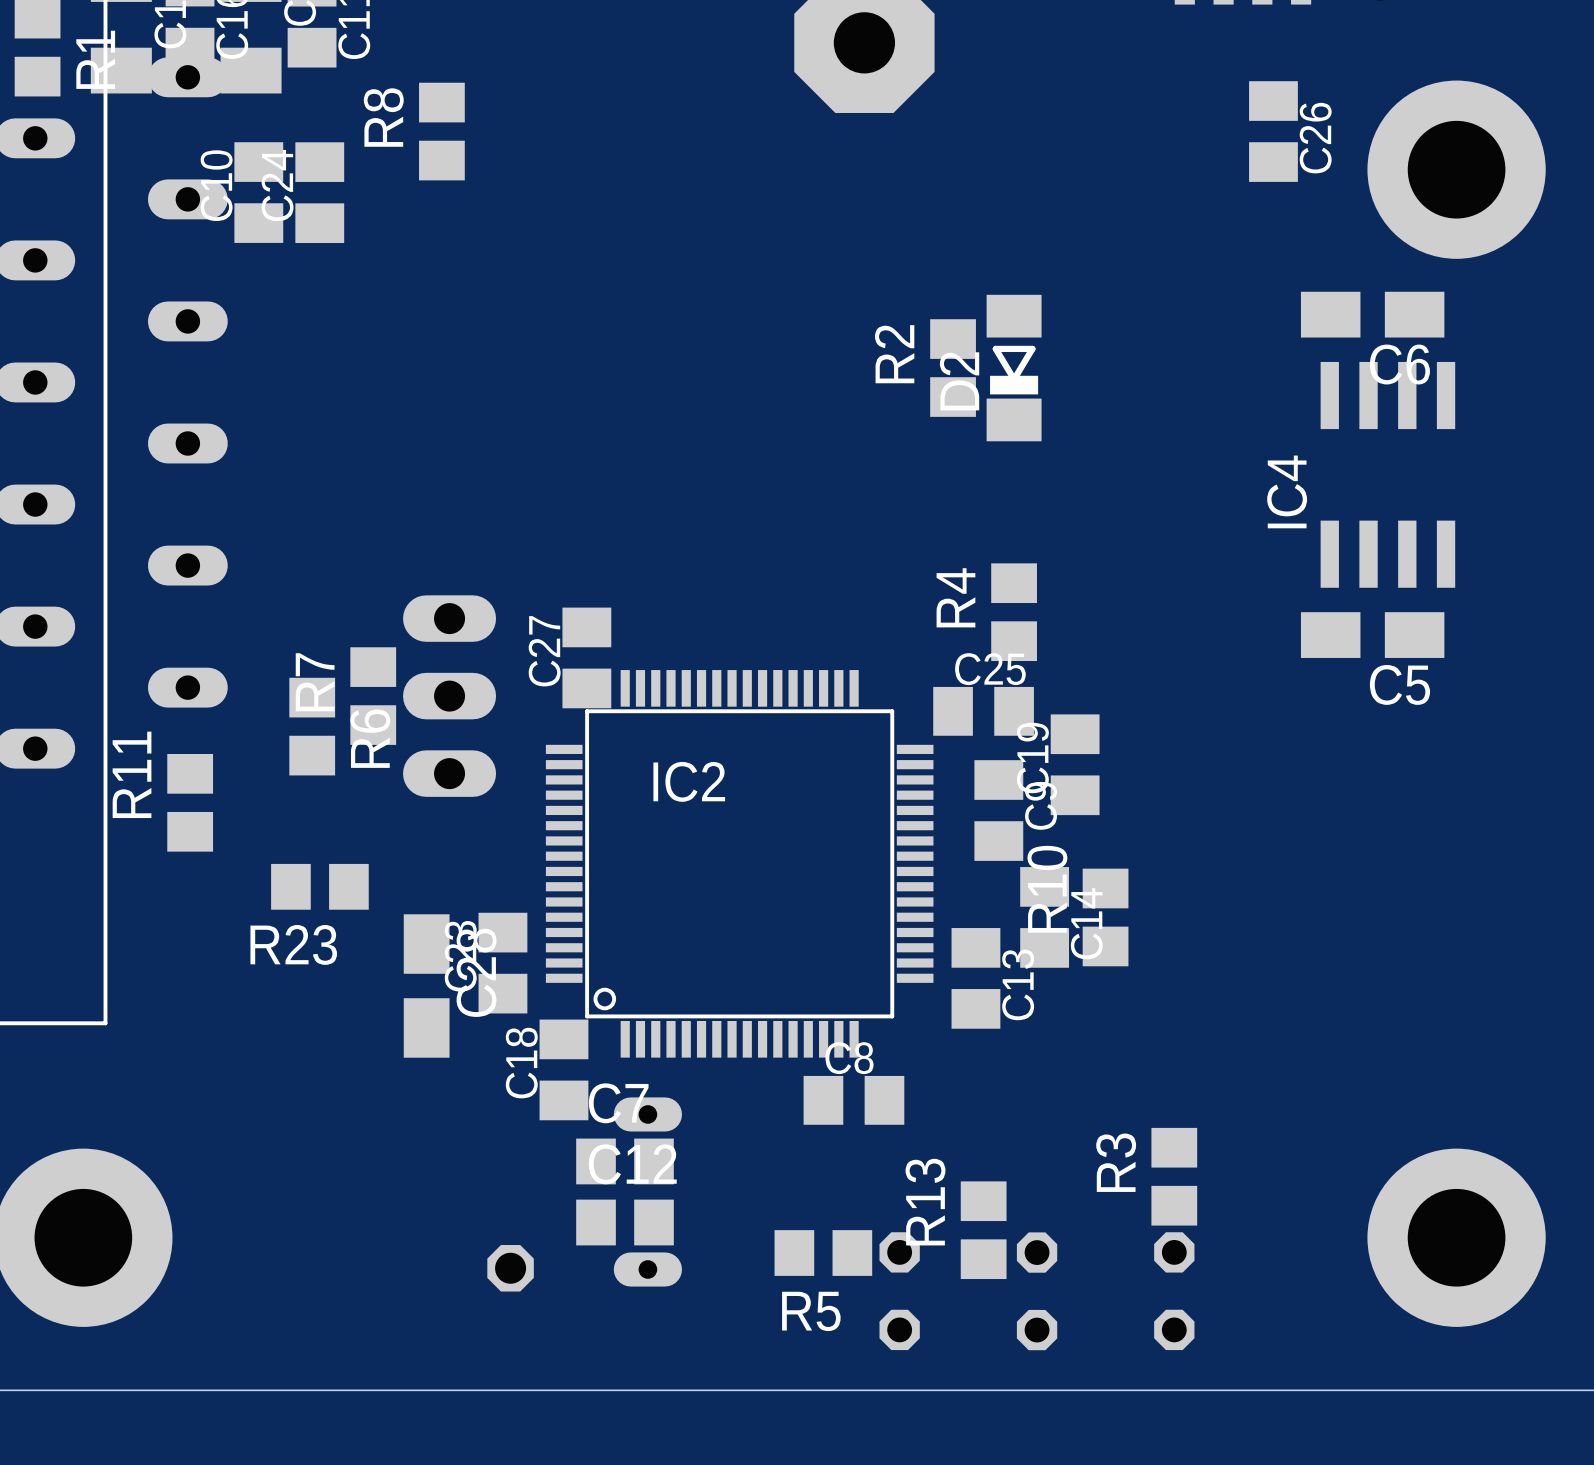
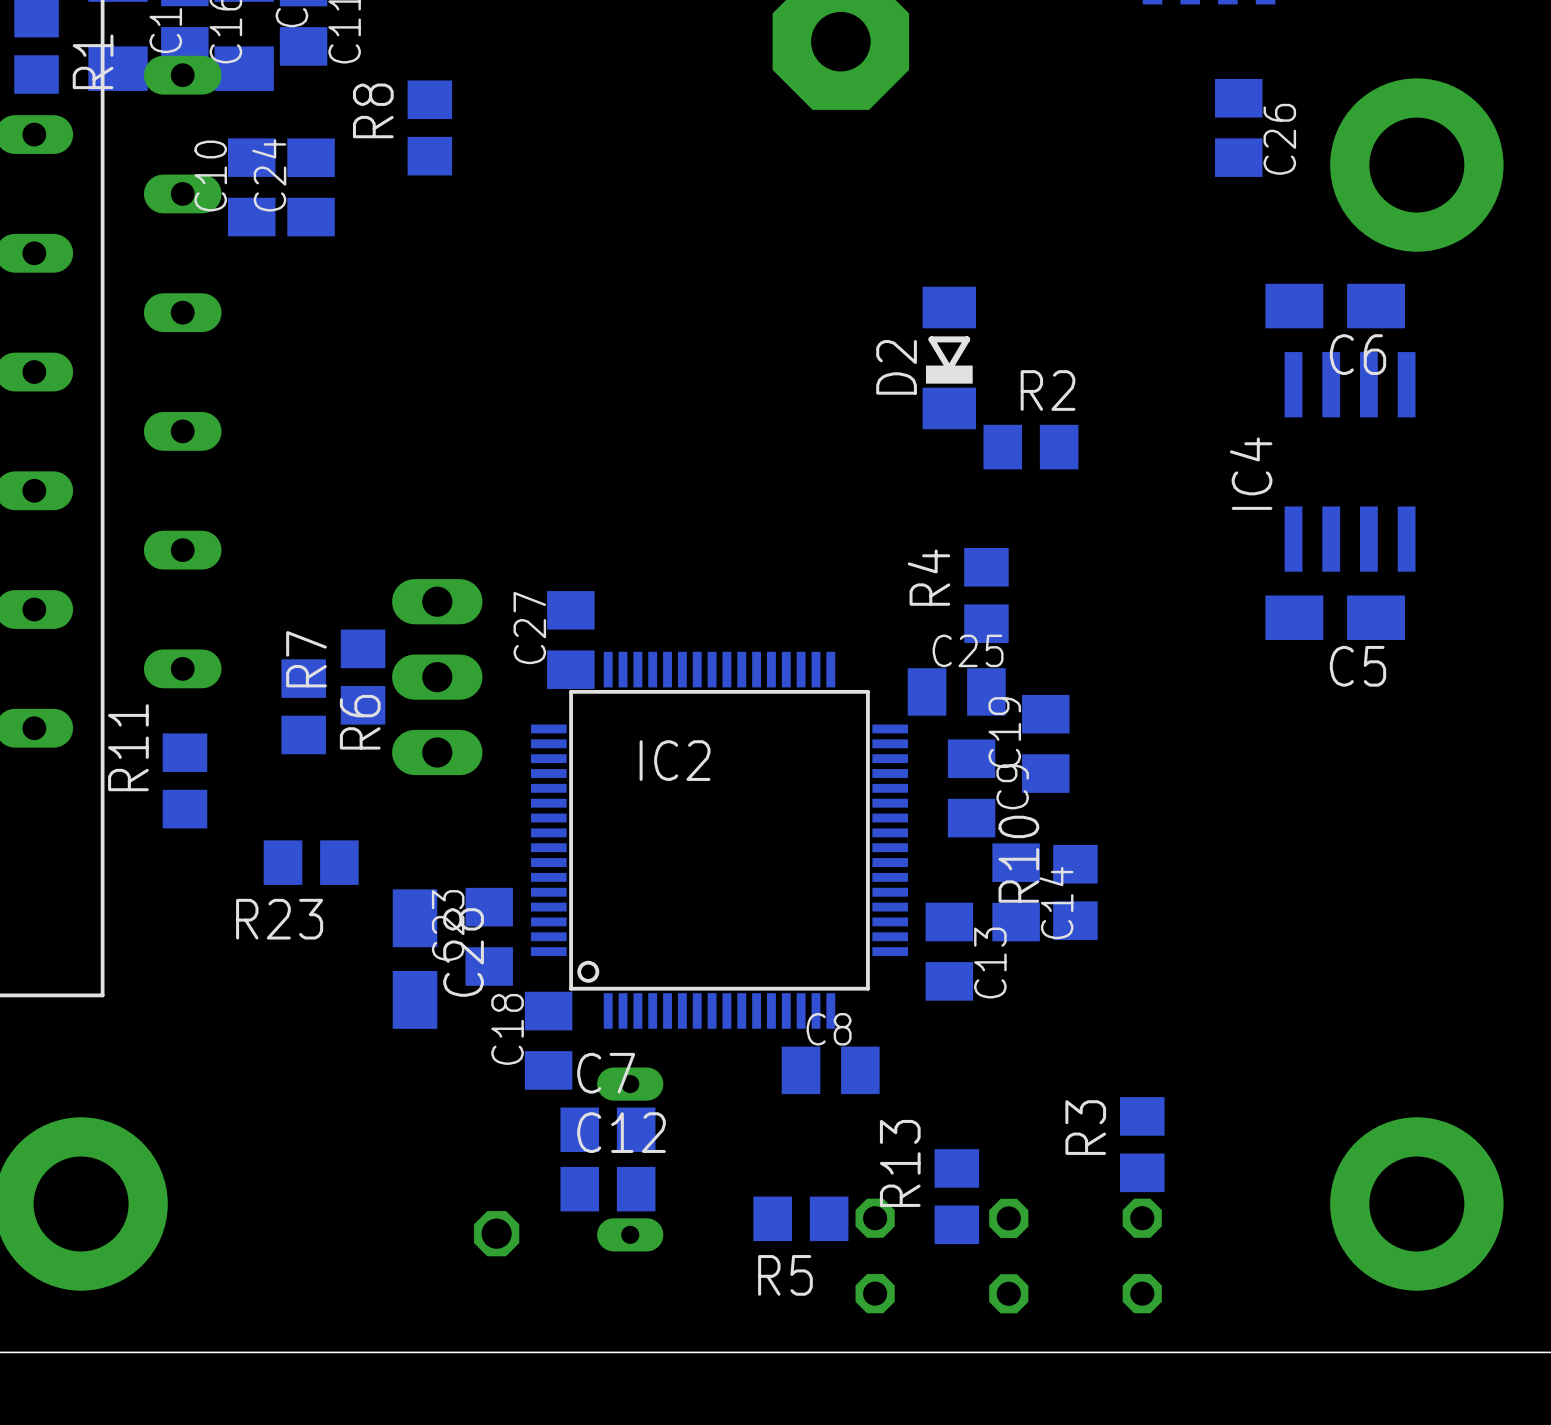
R2 rotation: 0° (953, 368) -> 90° clockwise (1030, 447)
R2 position: (953, 368) -> (1030, 447)
D2 position: (1014, 368) -> (949, 358)

